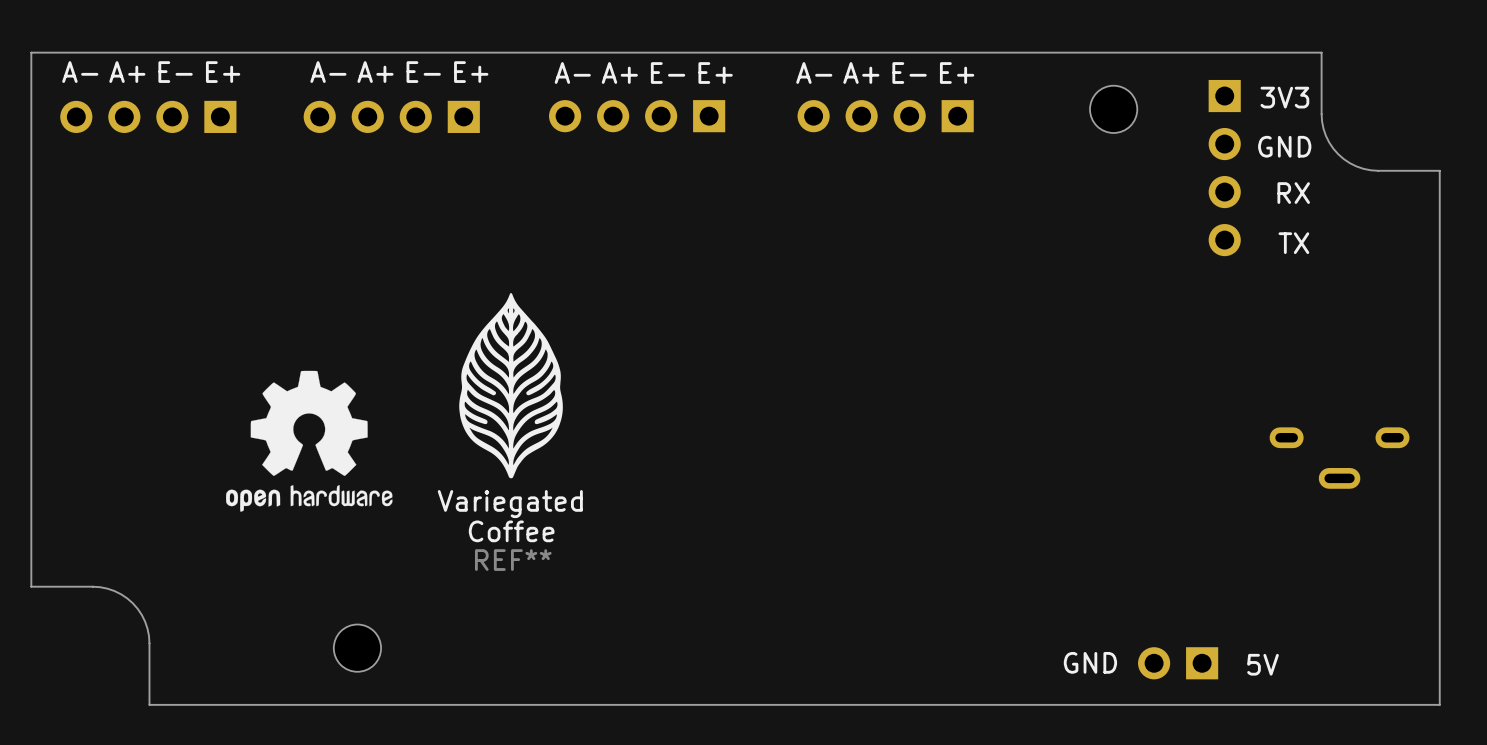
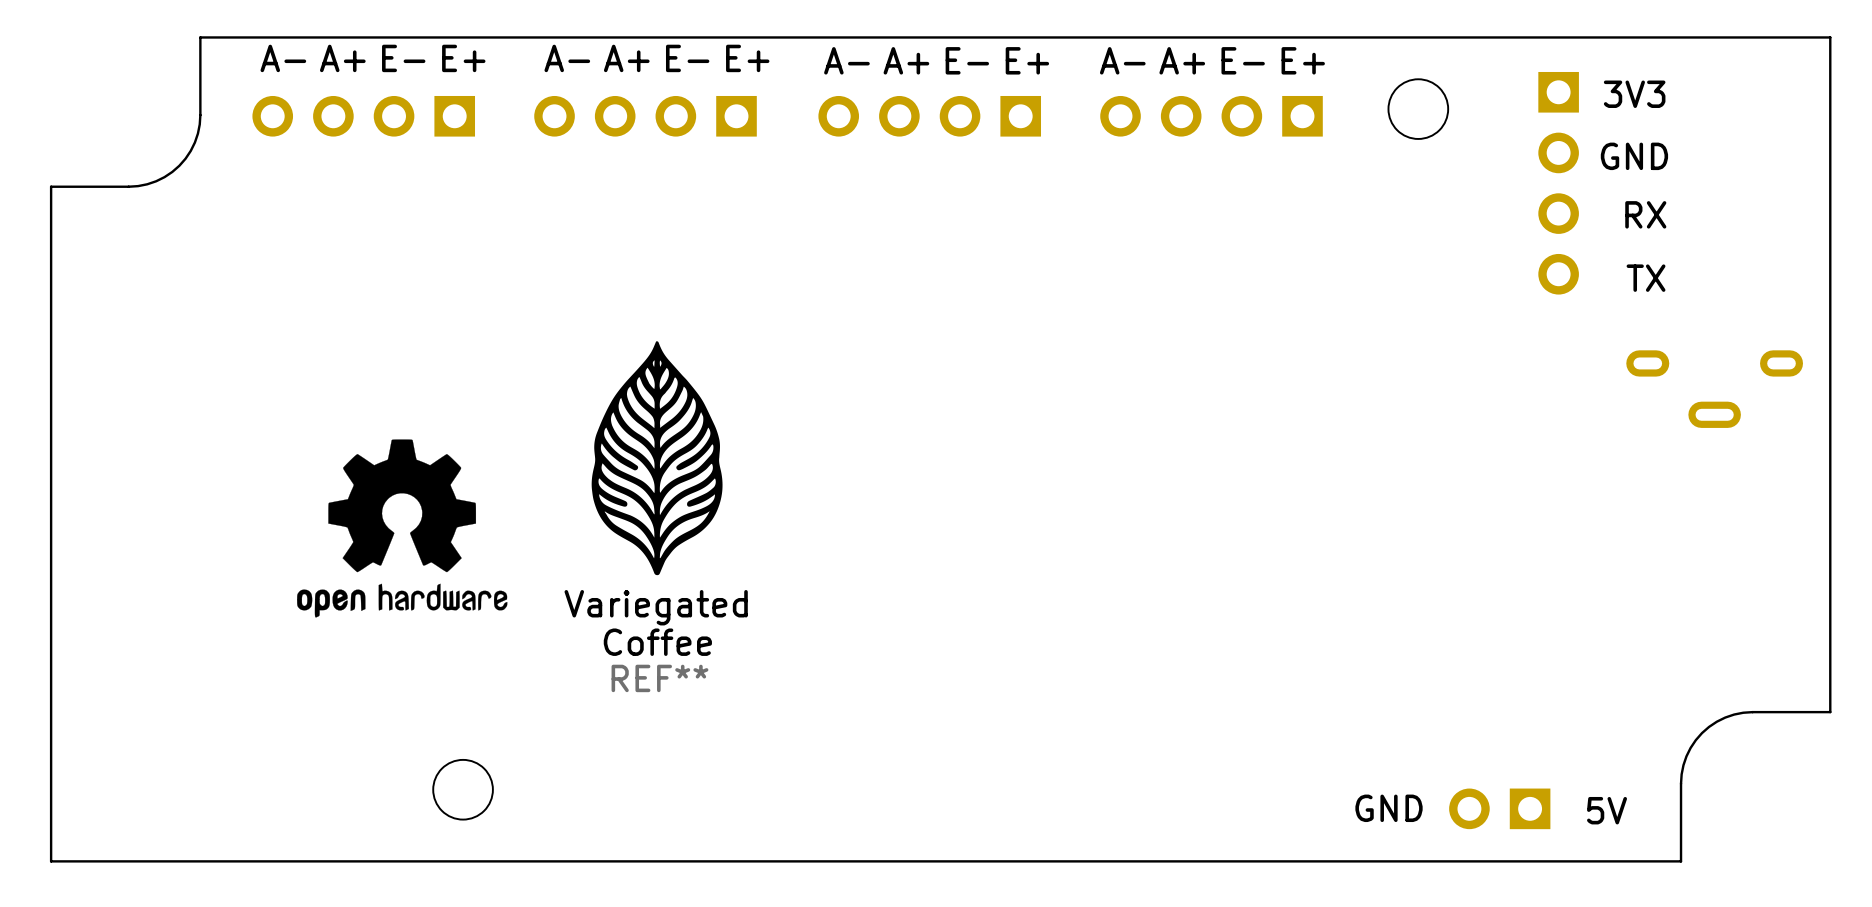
board edge: (149, 52) (31, 52) (31, 170) -> (200, 37) (199, 124) (194, 142) (179, 165) (156, 181) (138, 186) (51, 186)
board edge: (1321, 52) (1322, 121) (1325, 135) (1338, 154) (1356, 166) (1370, 170) (1439, 170) -> (1681, 37) (1830, 37) (1830, 186)
text: none -> A+ (342, 58)
text: none -> E- (403, 58)
text: none -> E+ (463, 58)
text: none -> A- (567, 58)
text: none -> A+ (626, 58)
text: none -> E- (687, 58)
text: none -> E- (967, 60)
text: none -> E+ (1027, 60)
text: A- (80, 72) -> none
text: A+ (127, 72) -> none
text: E- (175, 72) -> none
text: E+ (223, 72) -> A- (283, 58)
text: A- (328, 72) -> none
text: A+ (375, 72) -> none
text: E- (423, 72) -> none
text: E+ (471, 72) -> none
text: A- (572, 73) -> E+ (747, 58)
text: A+ (619, 73) -> none
text: E- (668, 73) -> A- (846, 60)
text: E+ (715, 73) -> A+ (906, 60)
text position: A- (814, 73) -> A- (1122, 60)
text position: A+ (861, 73) -> A+ (1182, 60)
text position: E- (909, 73) -> E- (1243, 60)
text position: E+ (957, 73) -> E+ (1303, 60)
part: none -> (363, 116)
part: none -> (645, 116)
part: none -> (929, 116)
part: (148, 116) -> none
part: (391, 116) -> none
part: (637, 116) -> none
part position: (885, 116) -> (1211, 116)
part position: (1339, 458) -> (1714, 389)
board edge: (31, 586) (100, 587) (114, 591) (132, 603) (141, 615) (149, 636) (149, 704) -> (51, 712) (51, 861) (200, 861)
board edge: (1439, 586) (1439, 704) (1321, 704) -> (1830, 712) (1743, 712) (1716, 721) (1702, 733) (1690, 747) (1681, 774) (1681, 861)

